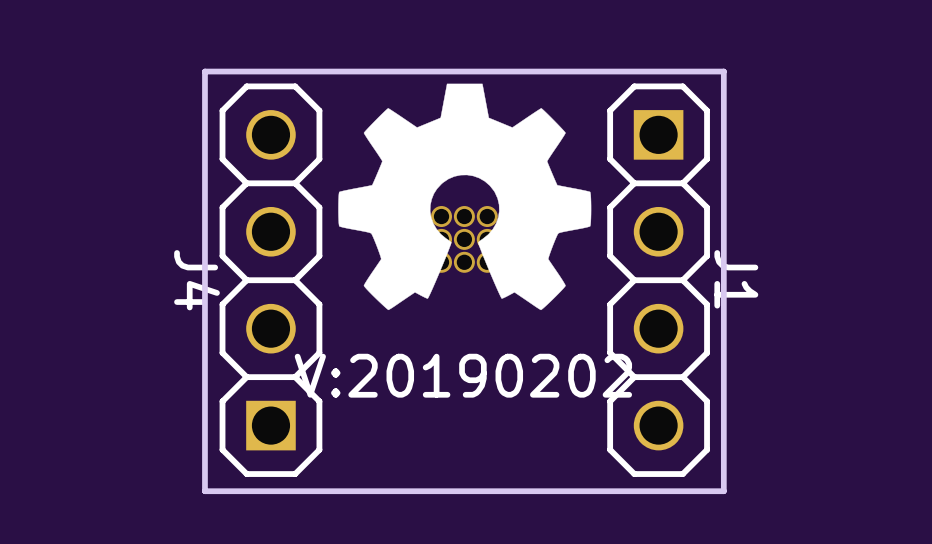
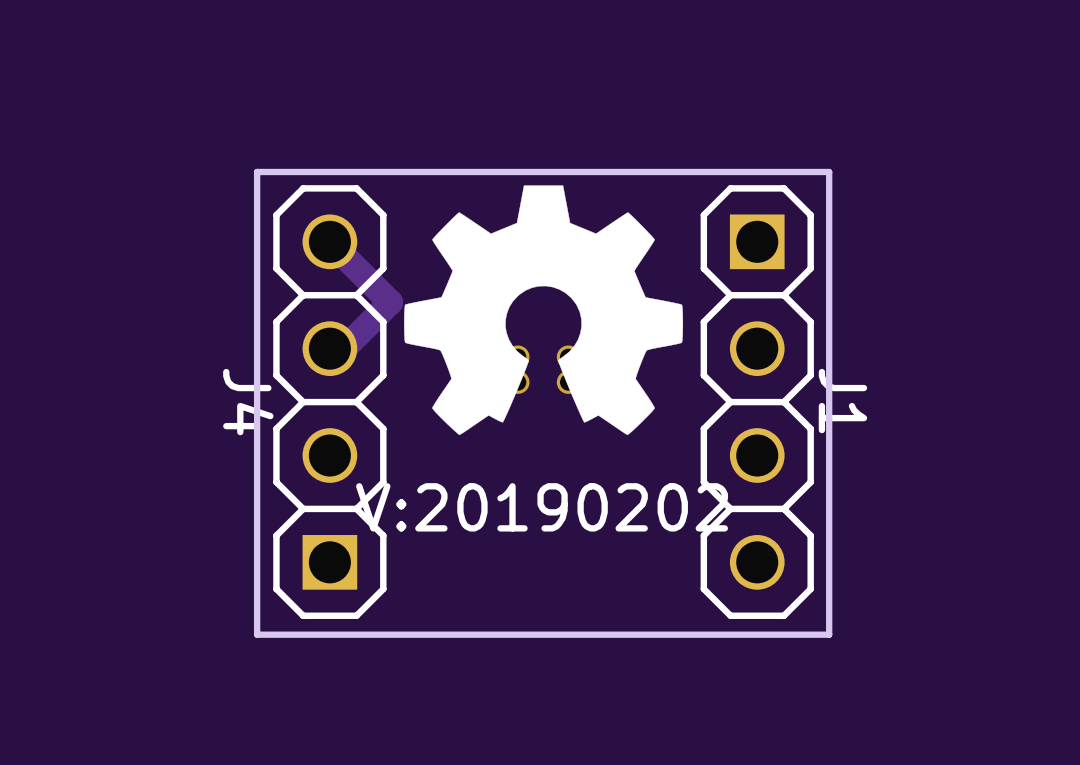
track: none -> (329, 241) (390, 302) (344, 348) (329, 348)
via: (441, 216) -> none
via: (464, 216) -> none
via: (487, 216) -> none
via: (464, 239) -> none
via: (464, 262) -> none

